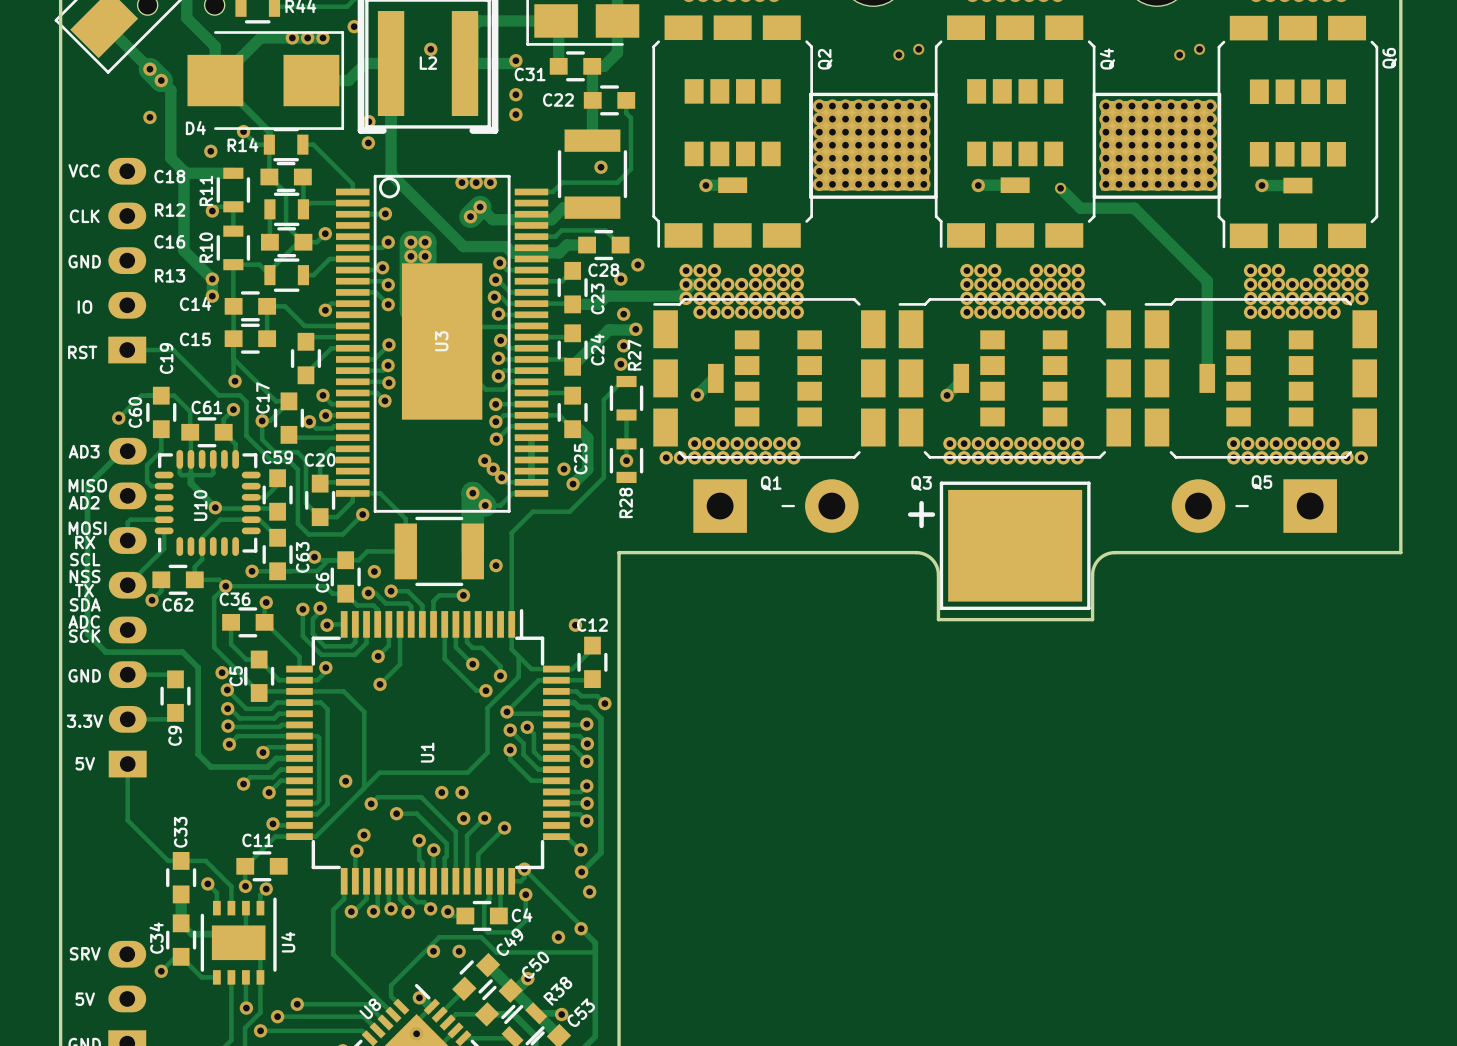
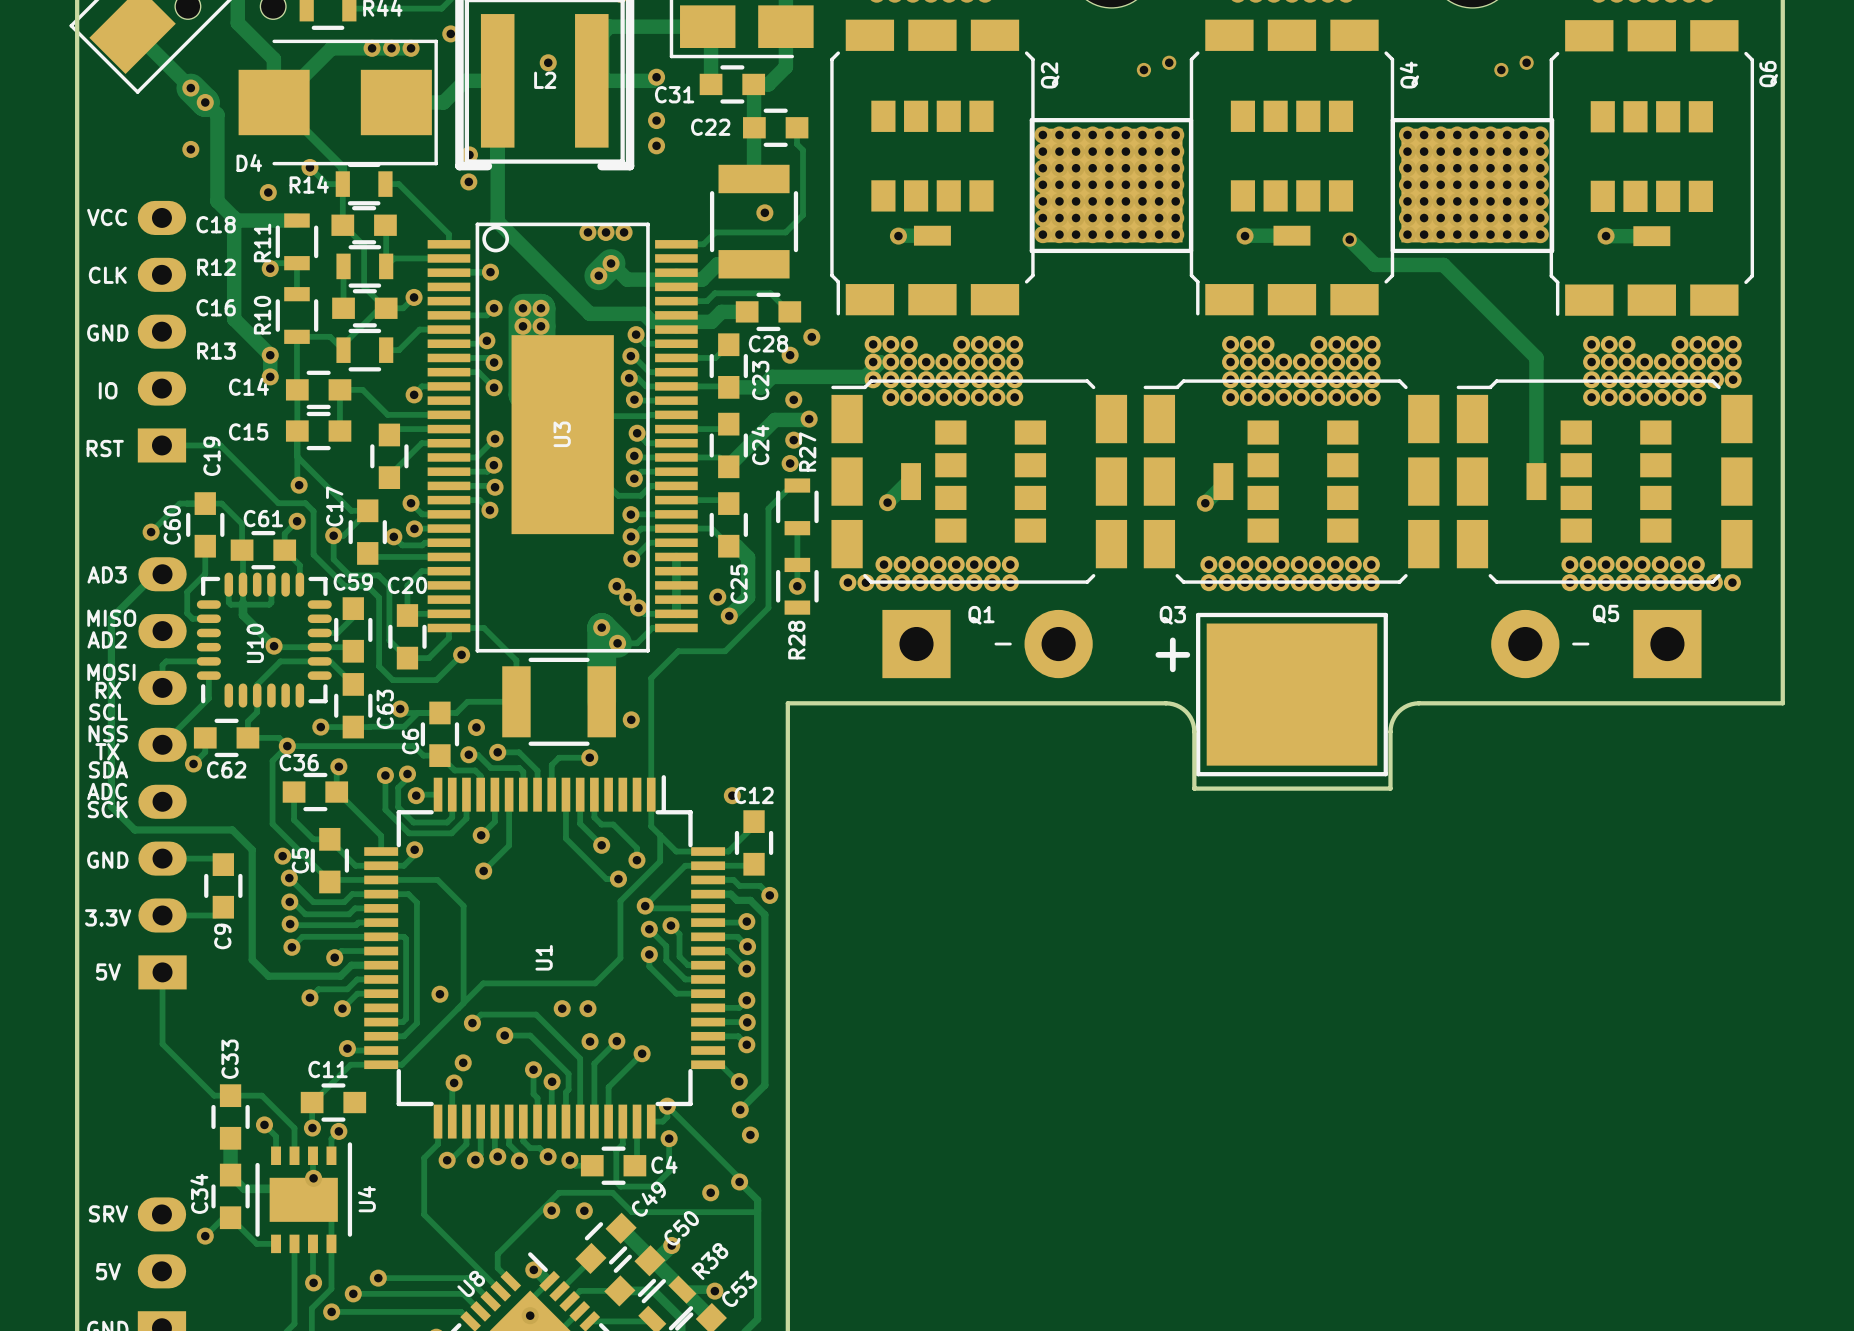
via: none -> (313, 1178)

